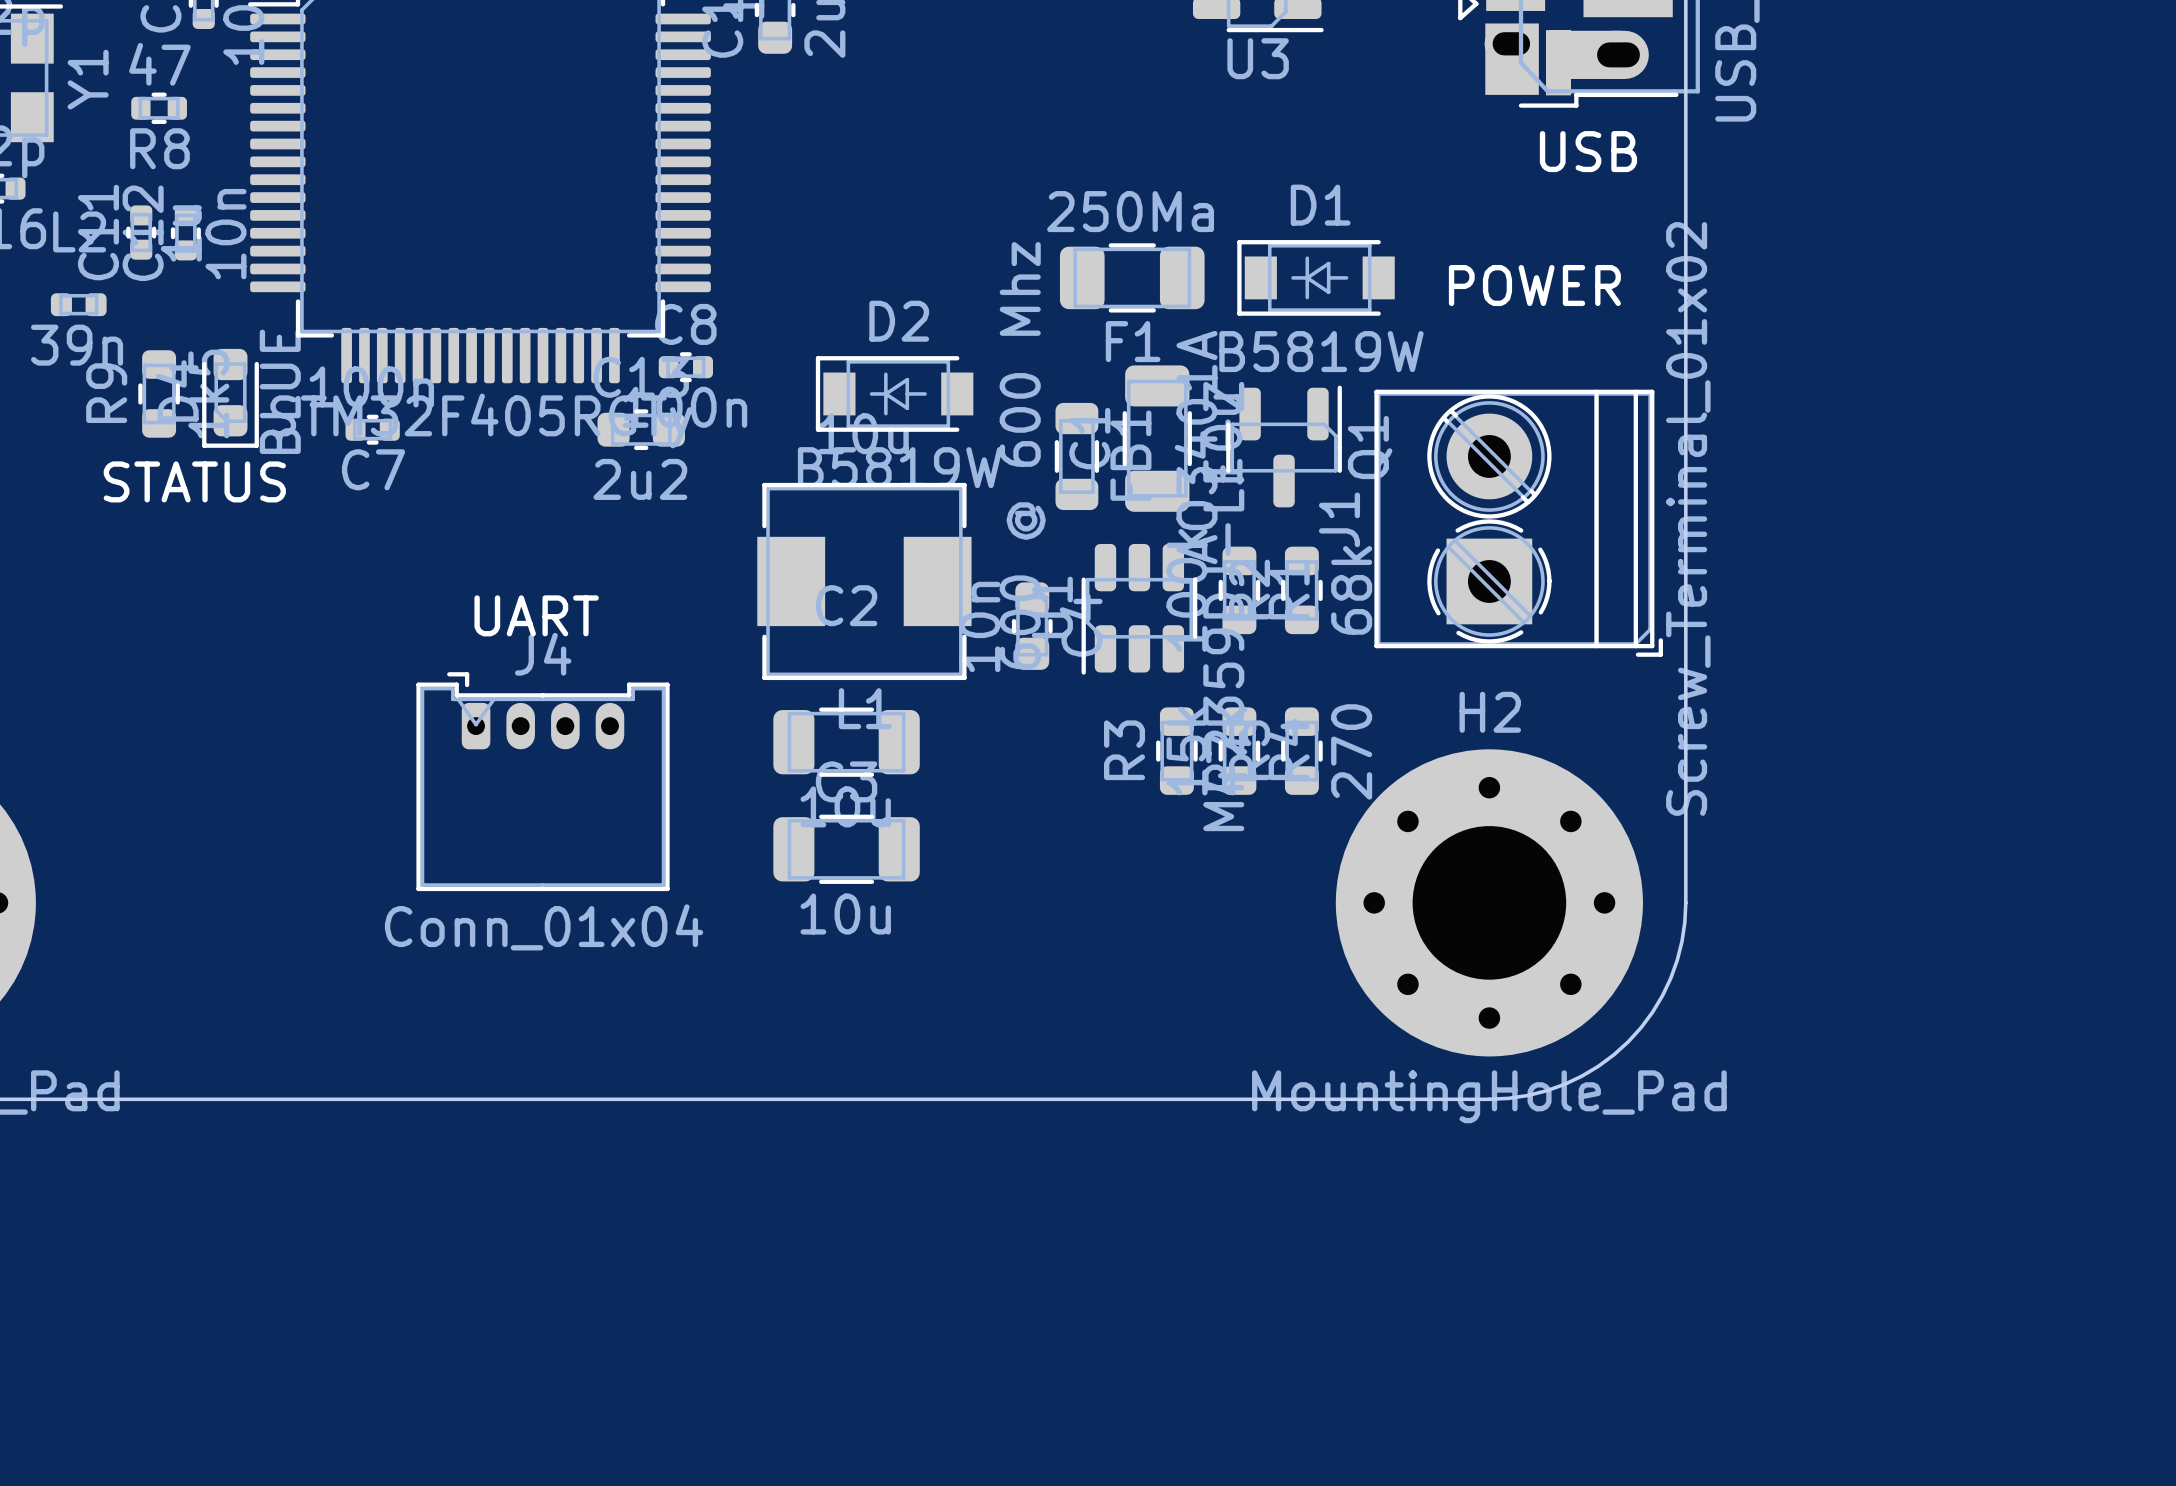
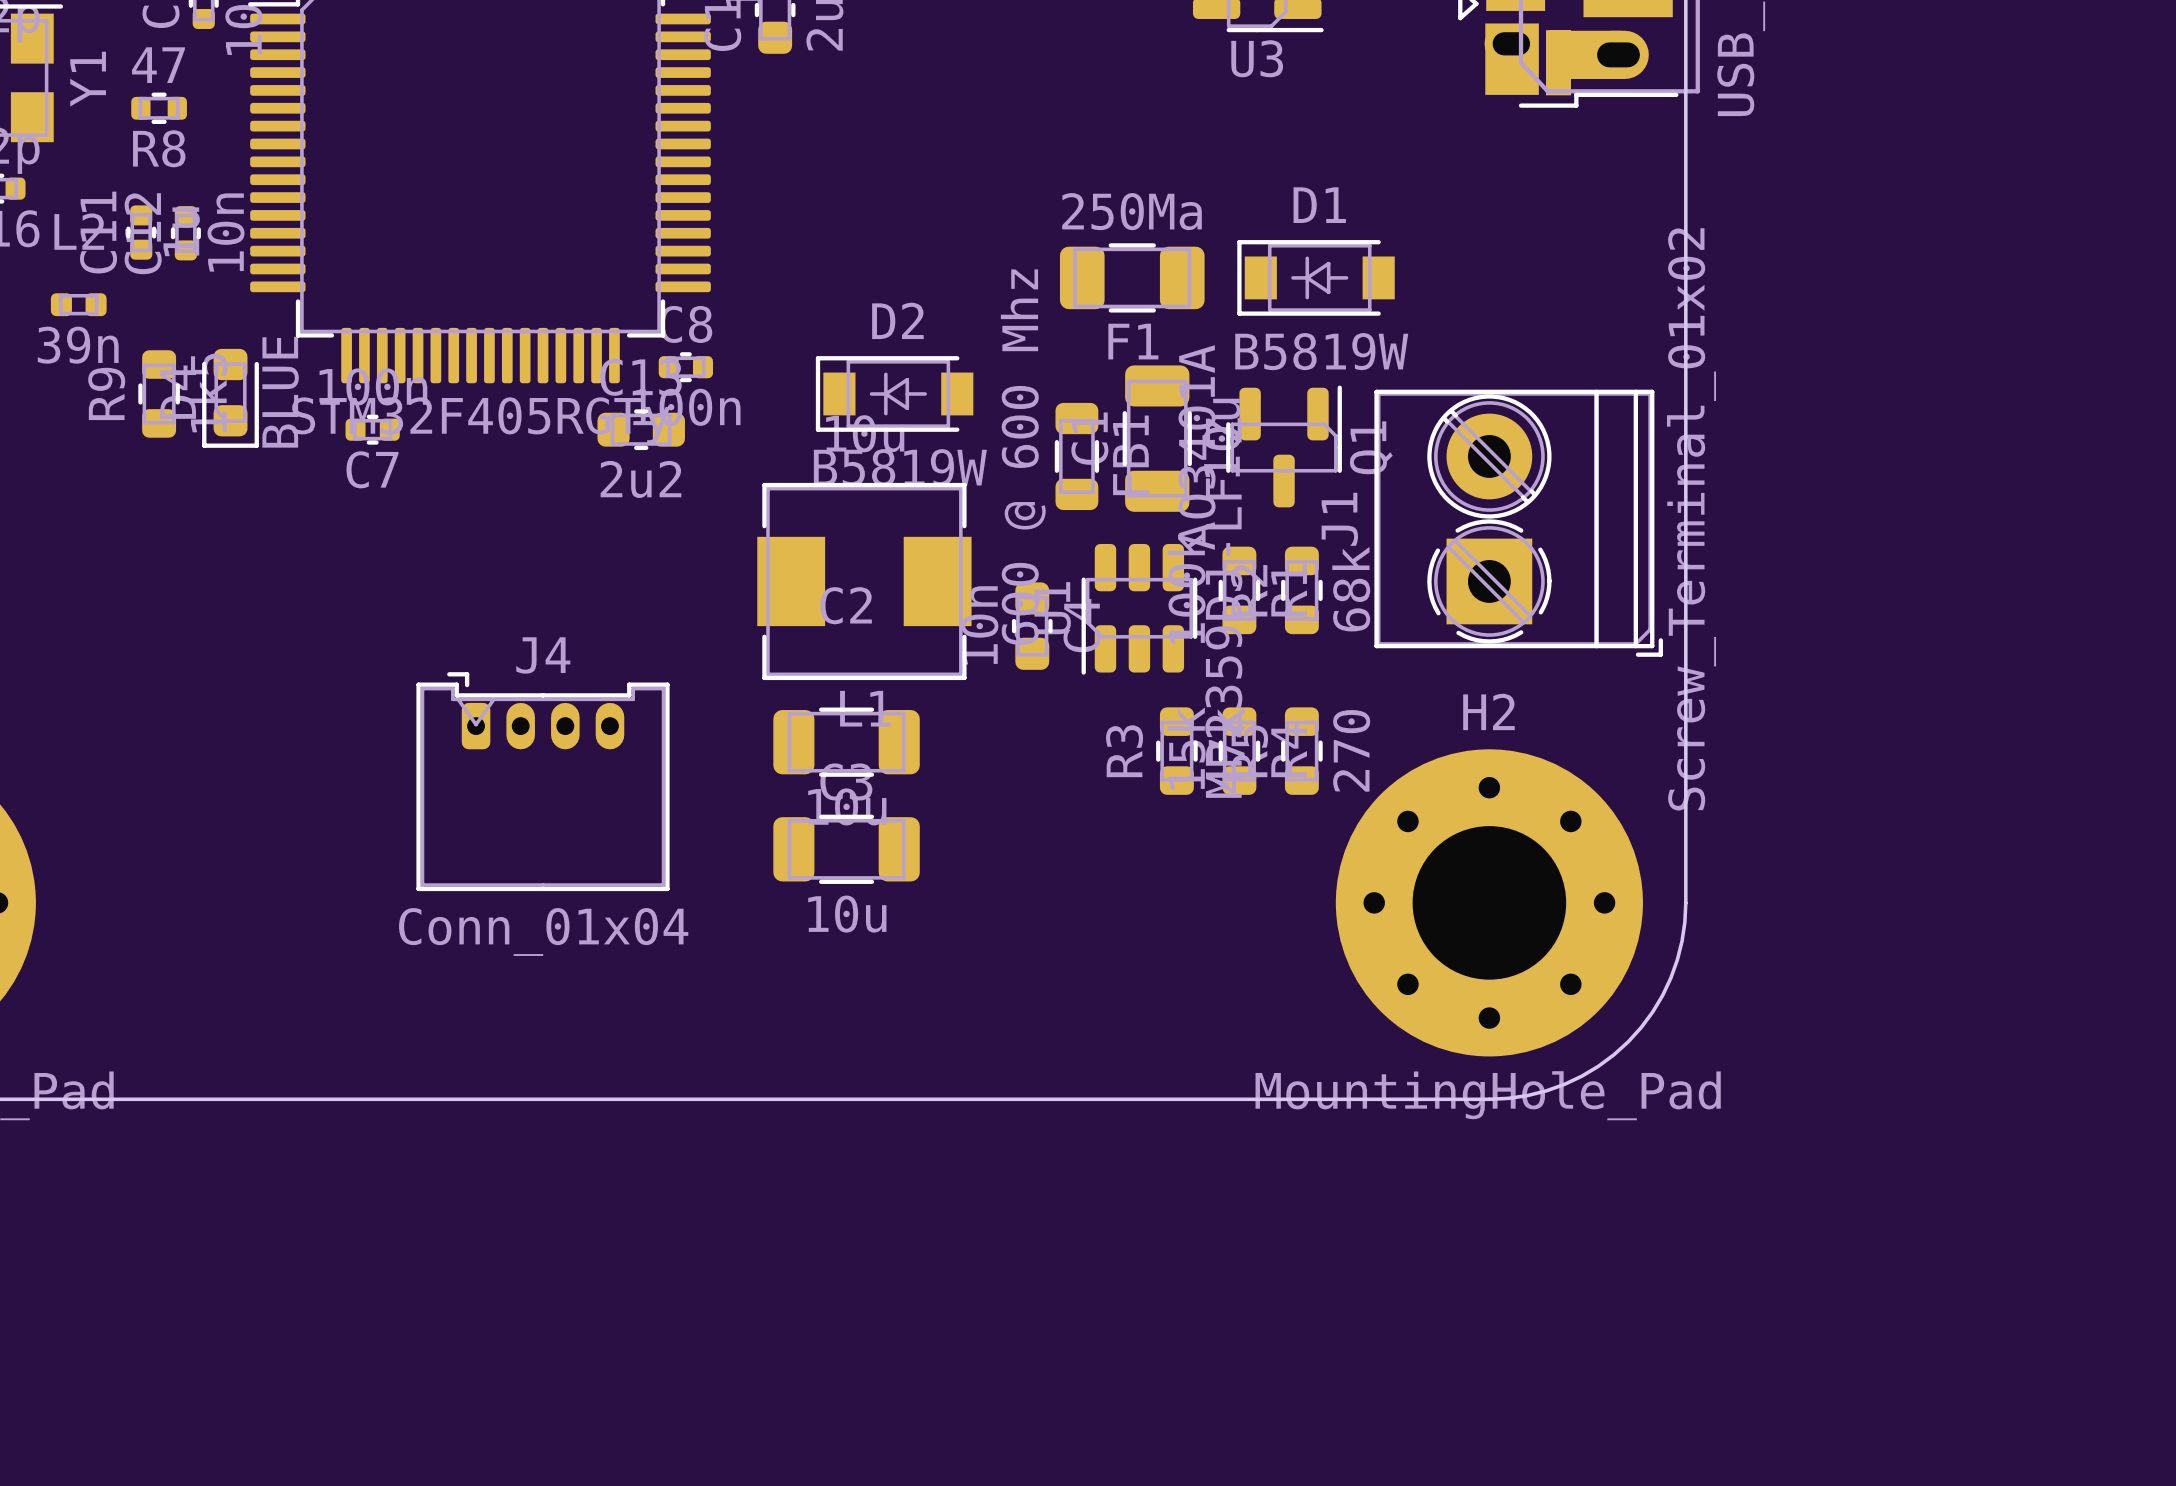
text: USB (1588, 151) -> none
text: POWER (1534, 285) -> none
text: STATUS (194, 481) -> none
text: UART (536, 615) -> none

